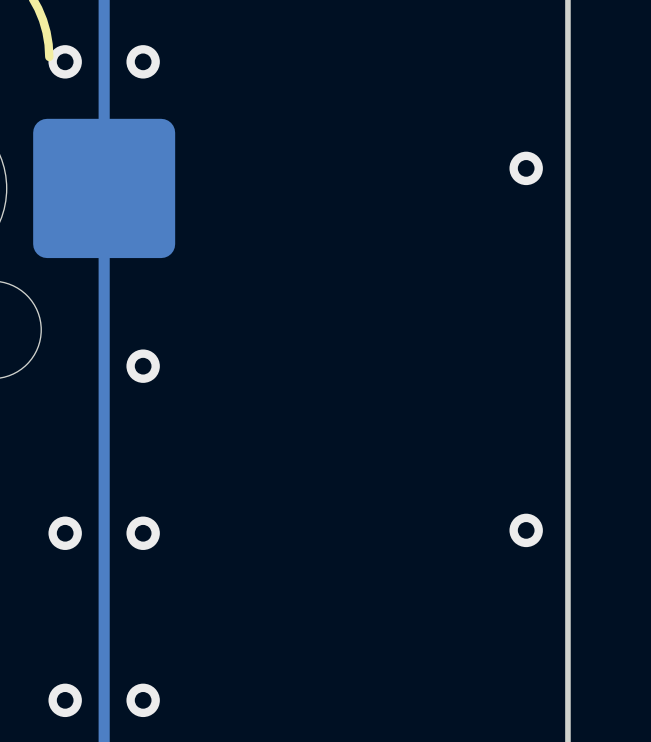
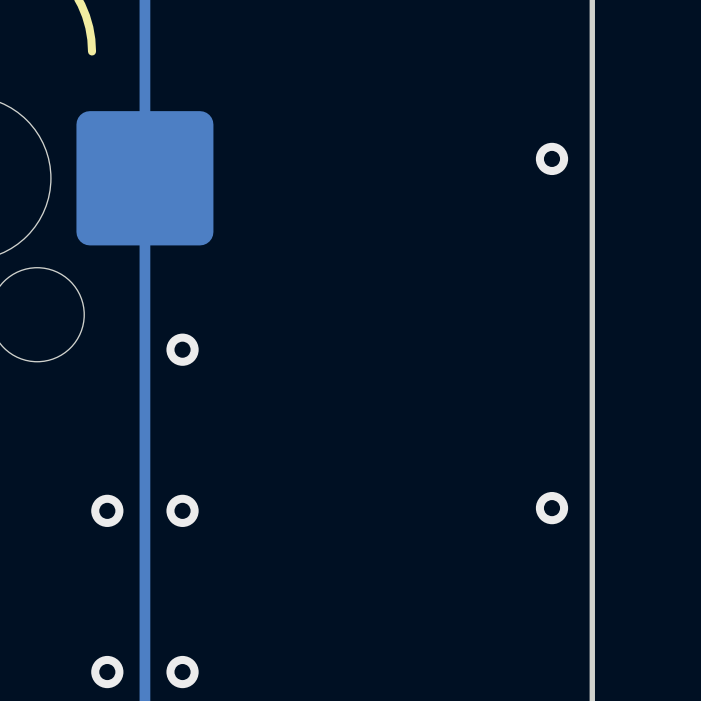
via: (65, 61) -> none
via: (143, 61) -> none

